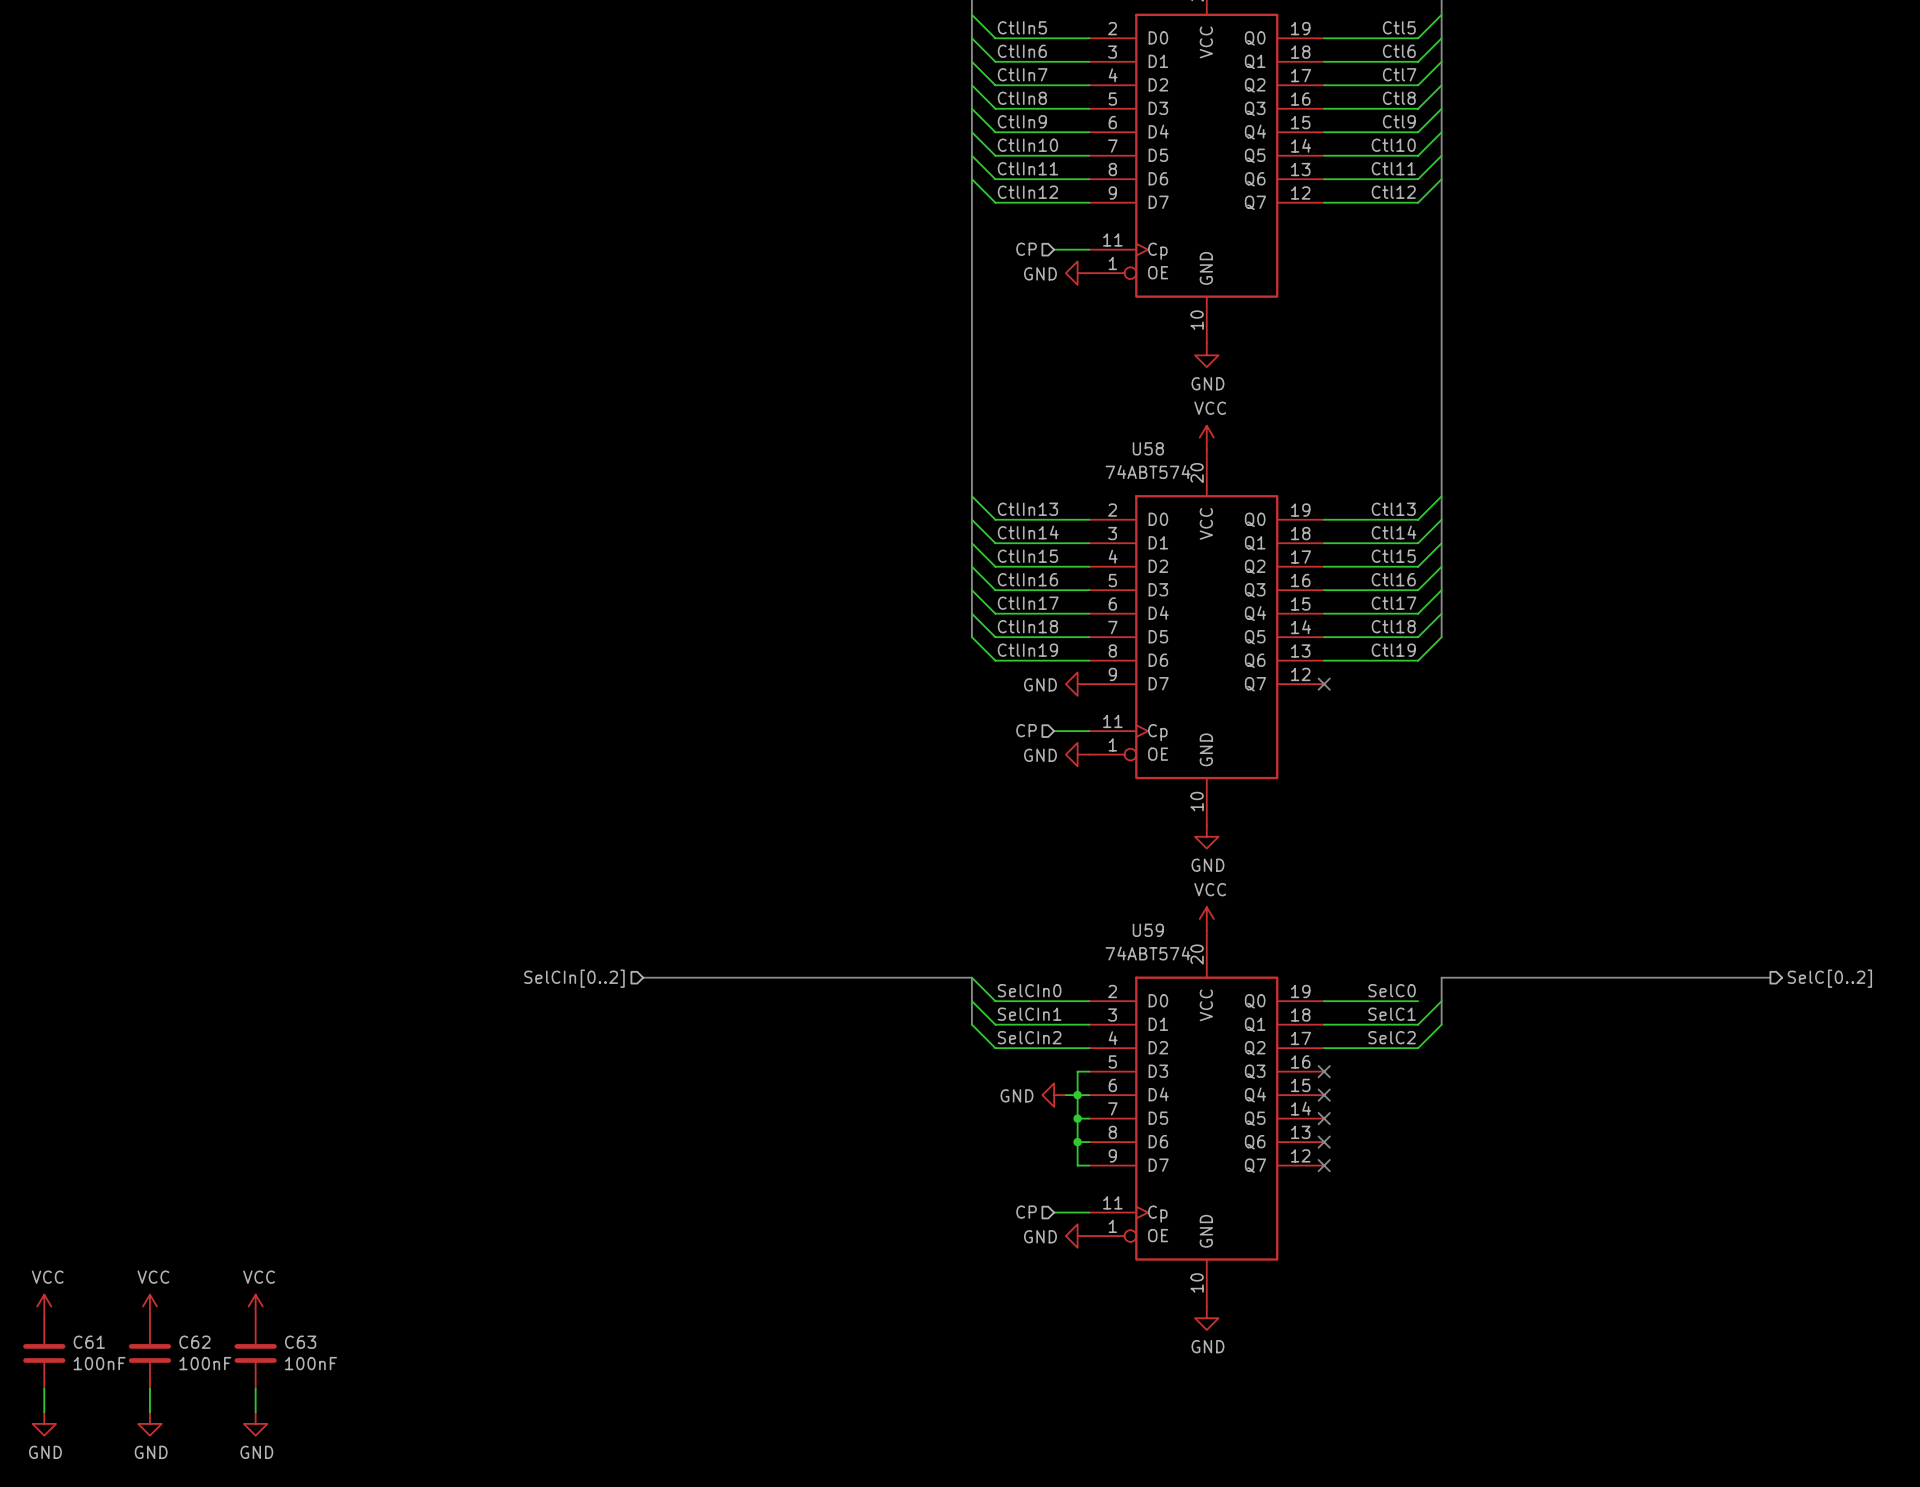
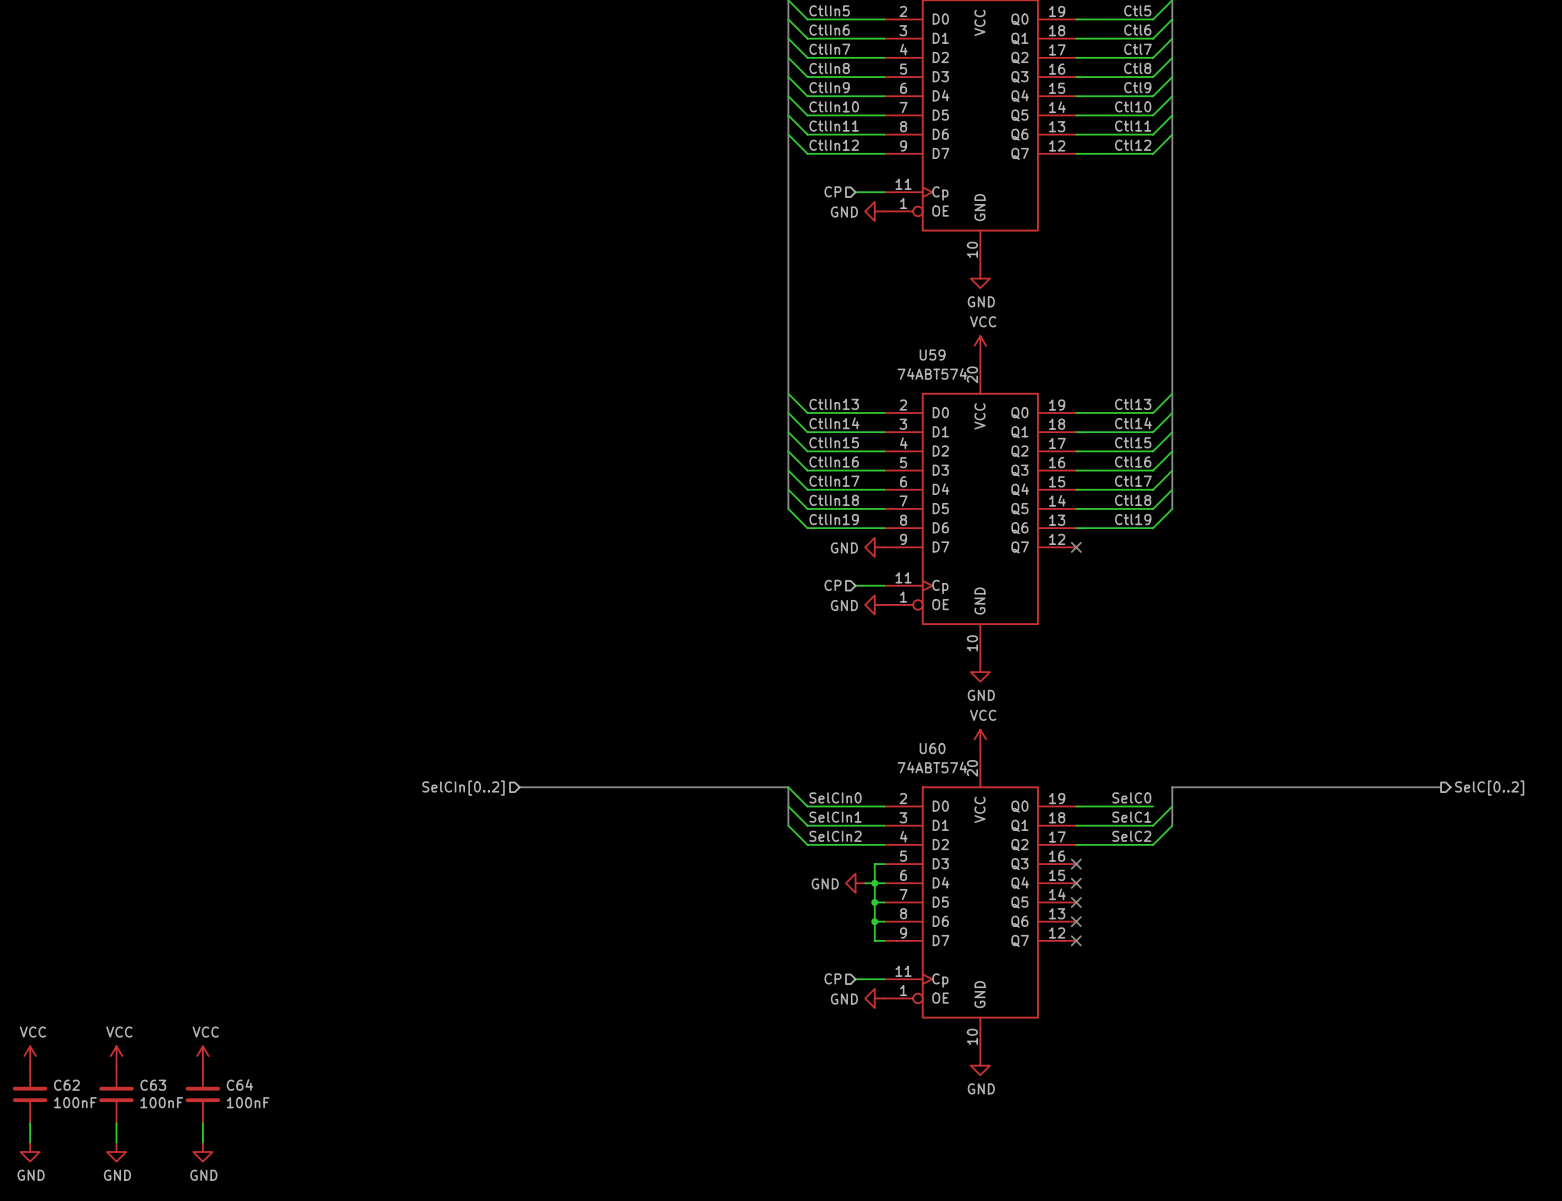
U58 name: U58 (1148, 448) -> U59 (932, 355)
U59 name: U59 (1148, 930) -> U60 (932, 748)
C61 name: C61 (89, 1342) -> C62 (66, 1085)
C62 name: C62 (194, 1342) -> C63 (153, 1085)
C63 name: C63 (300, 1342) -> C64 (239, 1085)

